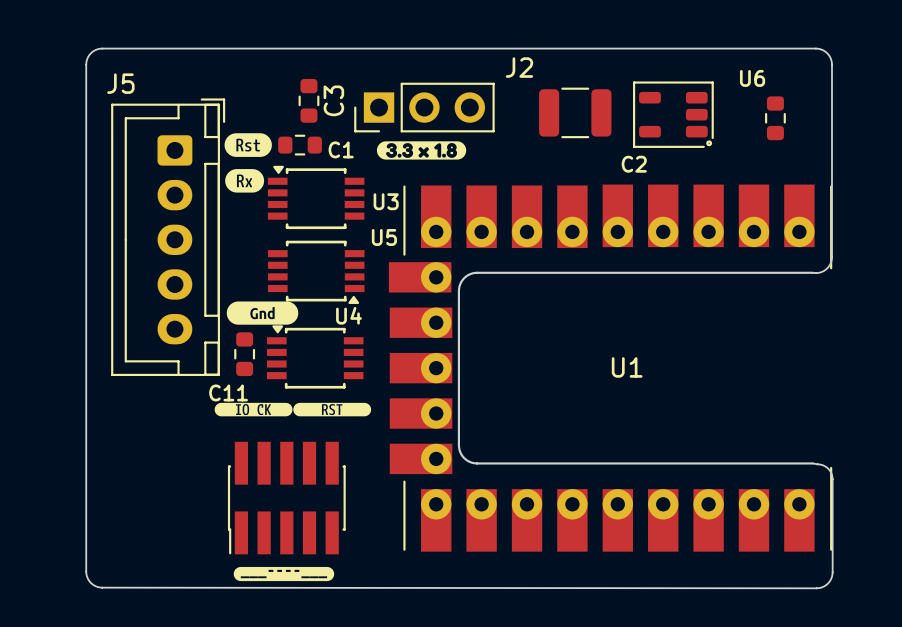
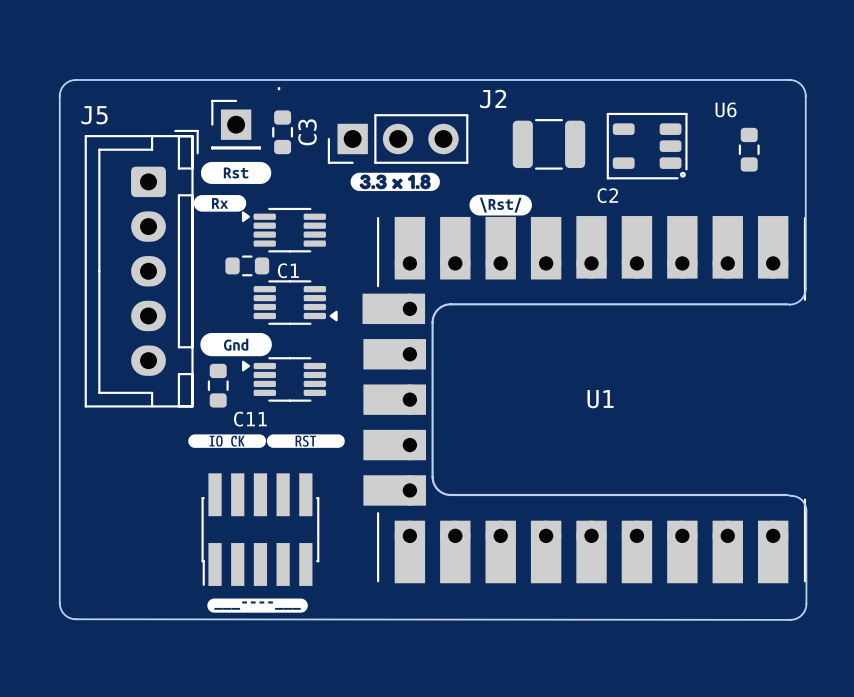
part: none -> (236, 124)
drawing shape: [224, 133, 272, 157] -> [200, 161, 272, 184]
C1 position: (300, 145) -> (247, 265)
drawing: none -> [469, 194, 532, 216]
drawing shape: [225, 169, 265, 193] -> [193, 195, 247, 212]
U3: (316, 197) -> none
part: none -> (283, 230)
part: none -> (295, 302)
U5: (316, 272) -> none
part: none -> (284, 379)
U4: (315, 356) -> none
C11 name position: C11 (228, 392) -> C11 (250, 419)

